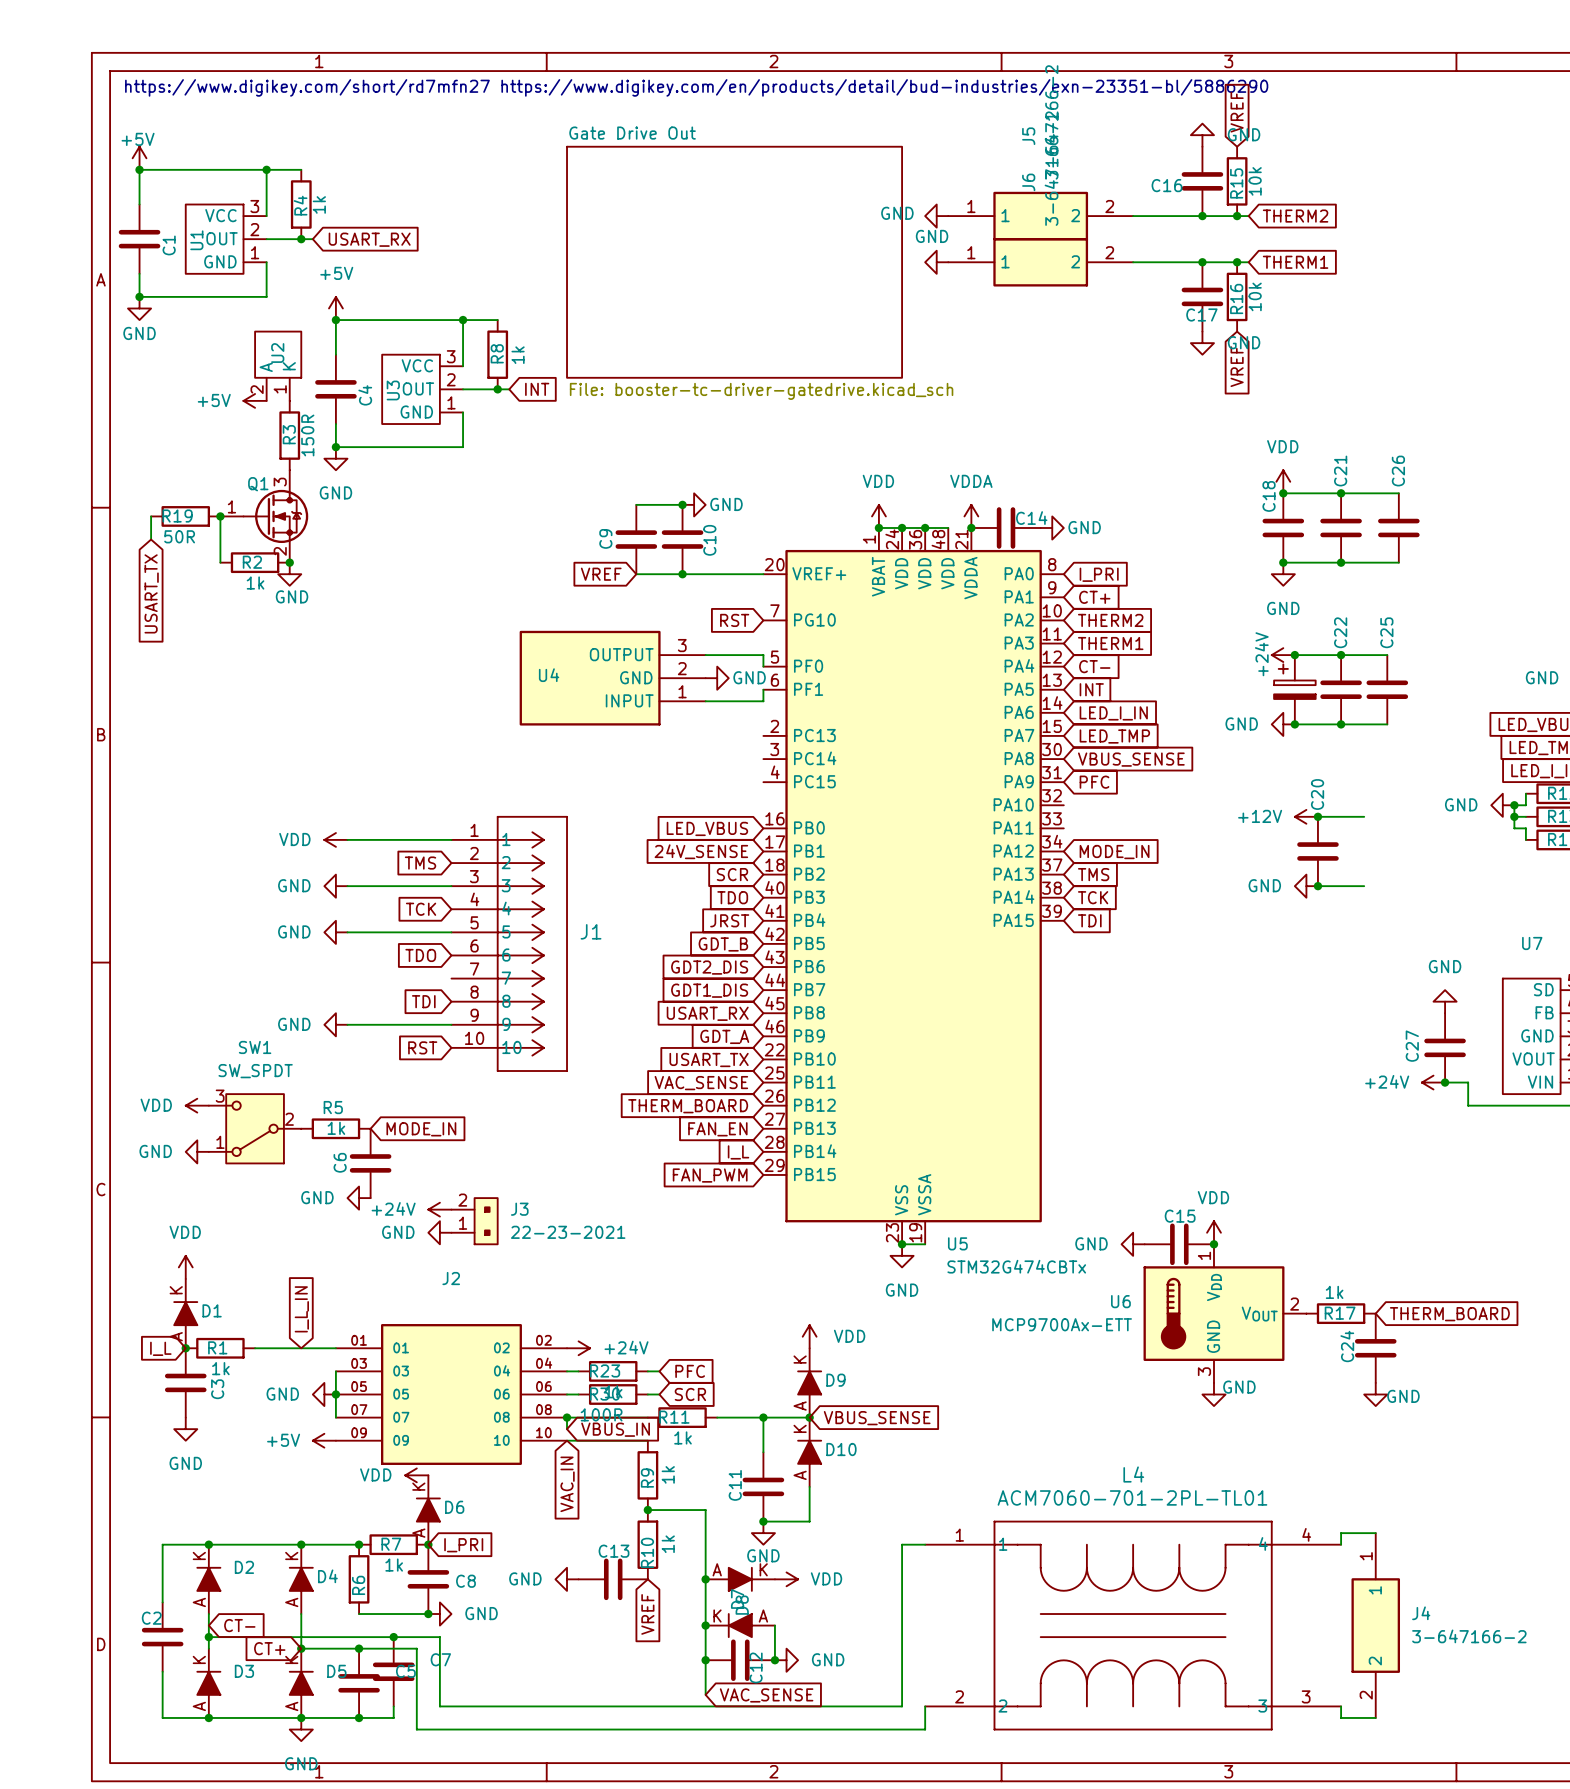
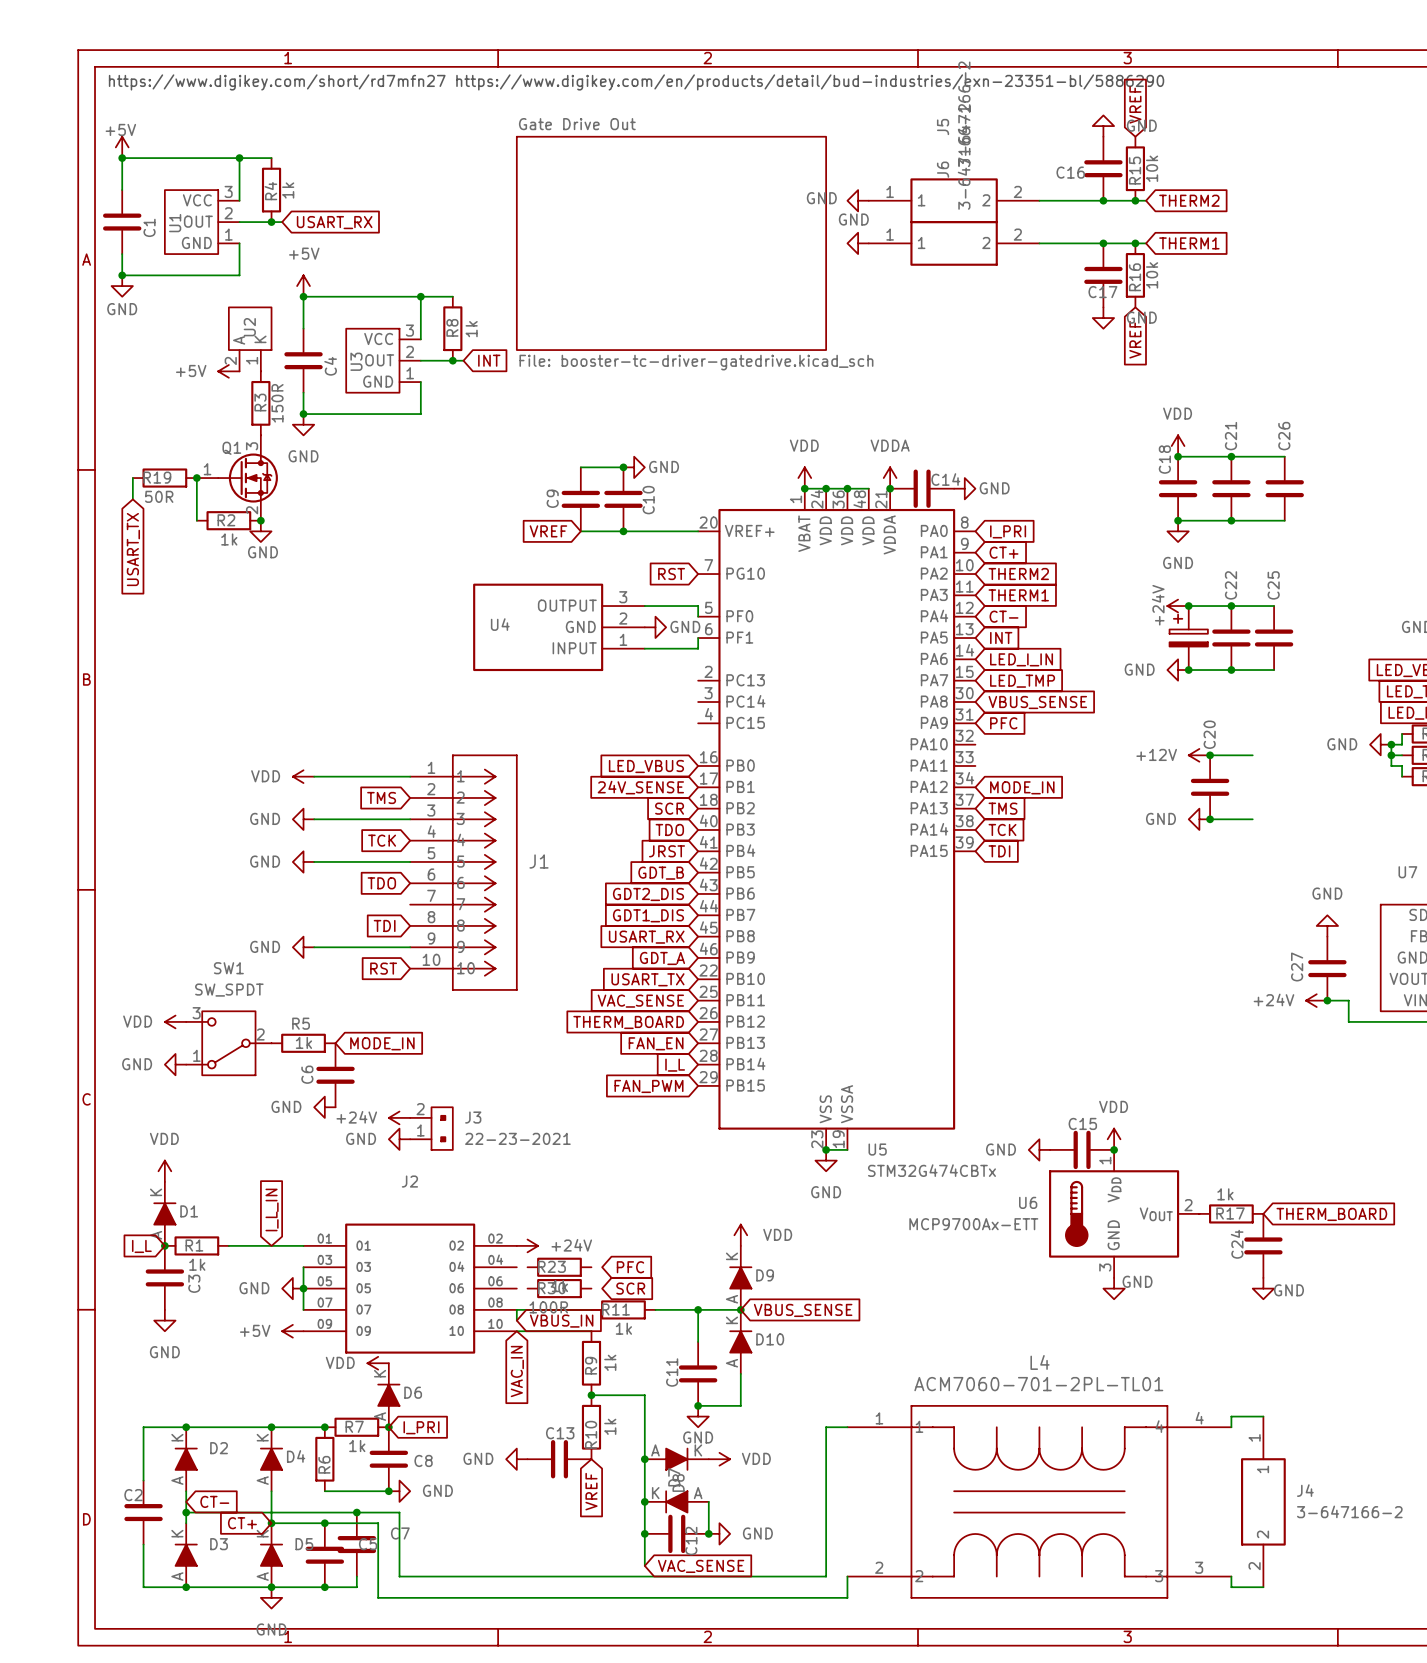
wire: (567, 1371) (578, 1371) -> none
wire: (647, 1371) (659, 1371) -> none
wire: (567, 1394) (578, 1394) -> none
wire: (647, 1394) (659, 1394) -> none
junction: (567, 1417) -> none

